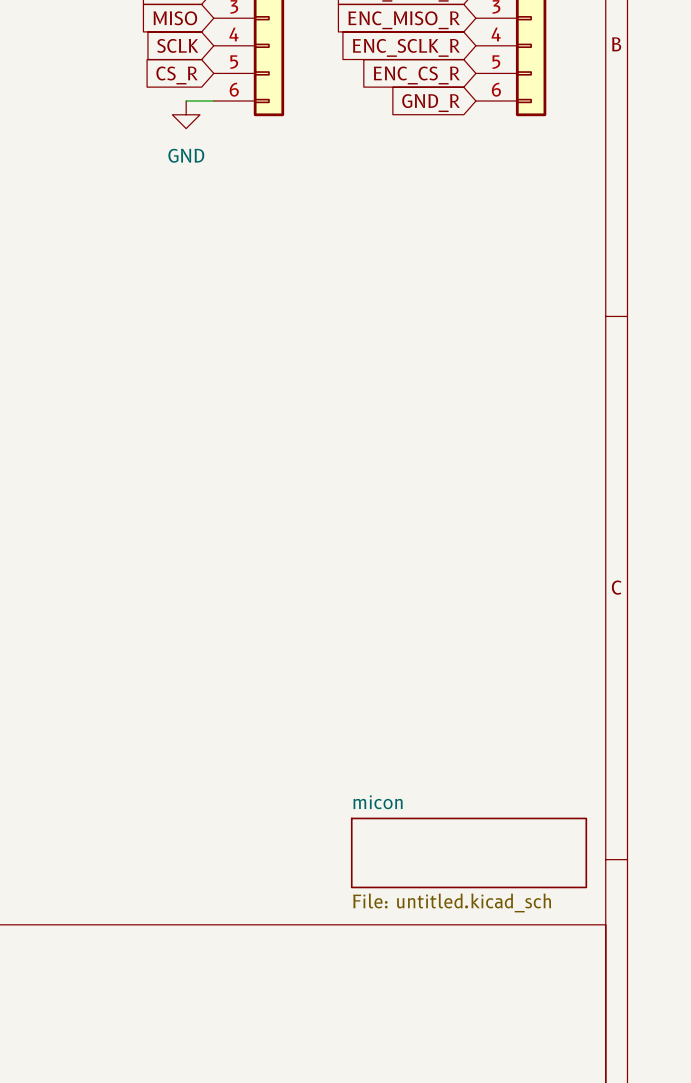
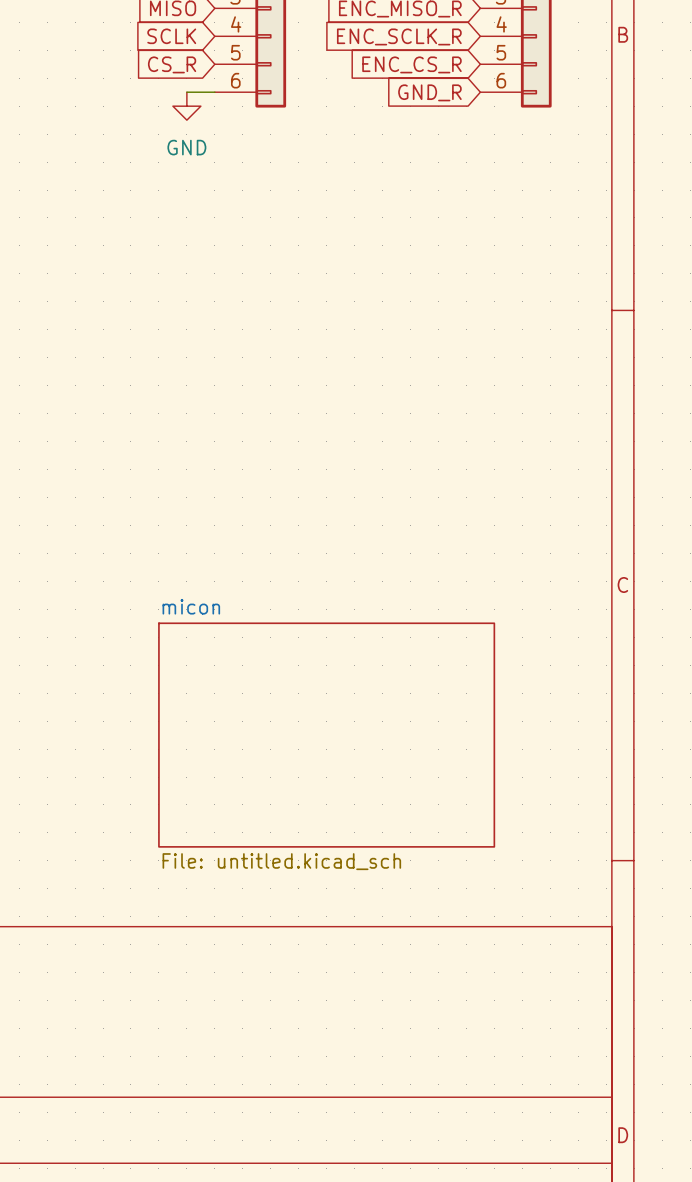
sheet micon: none -> File: untitled.kicad_sch (326, 735)
sheet micon: File: untitled.kicad_sch (469, 852) -> none

